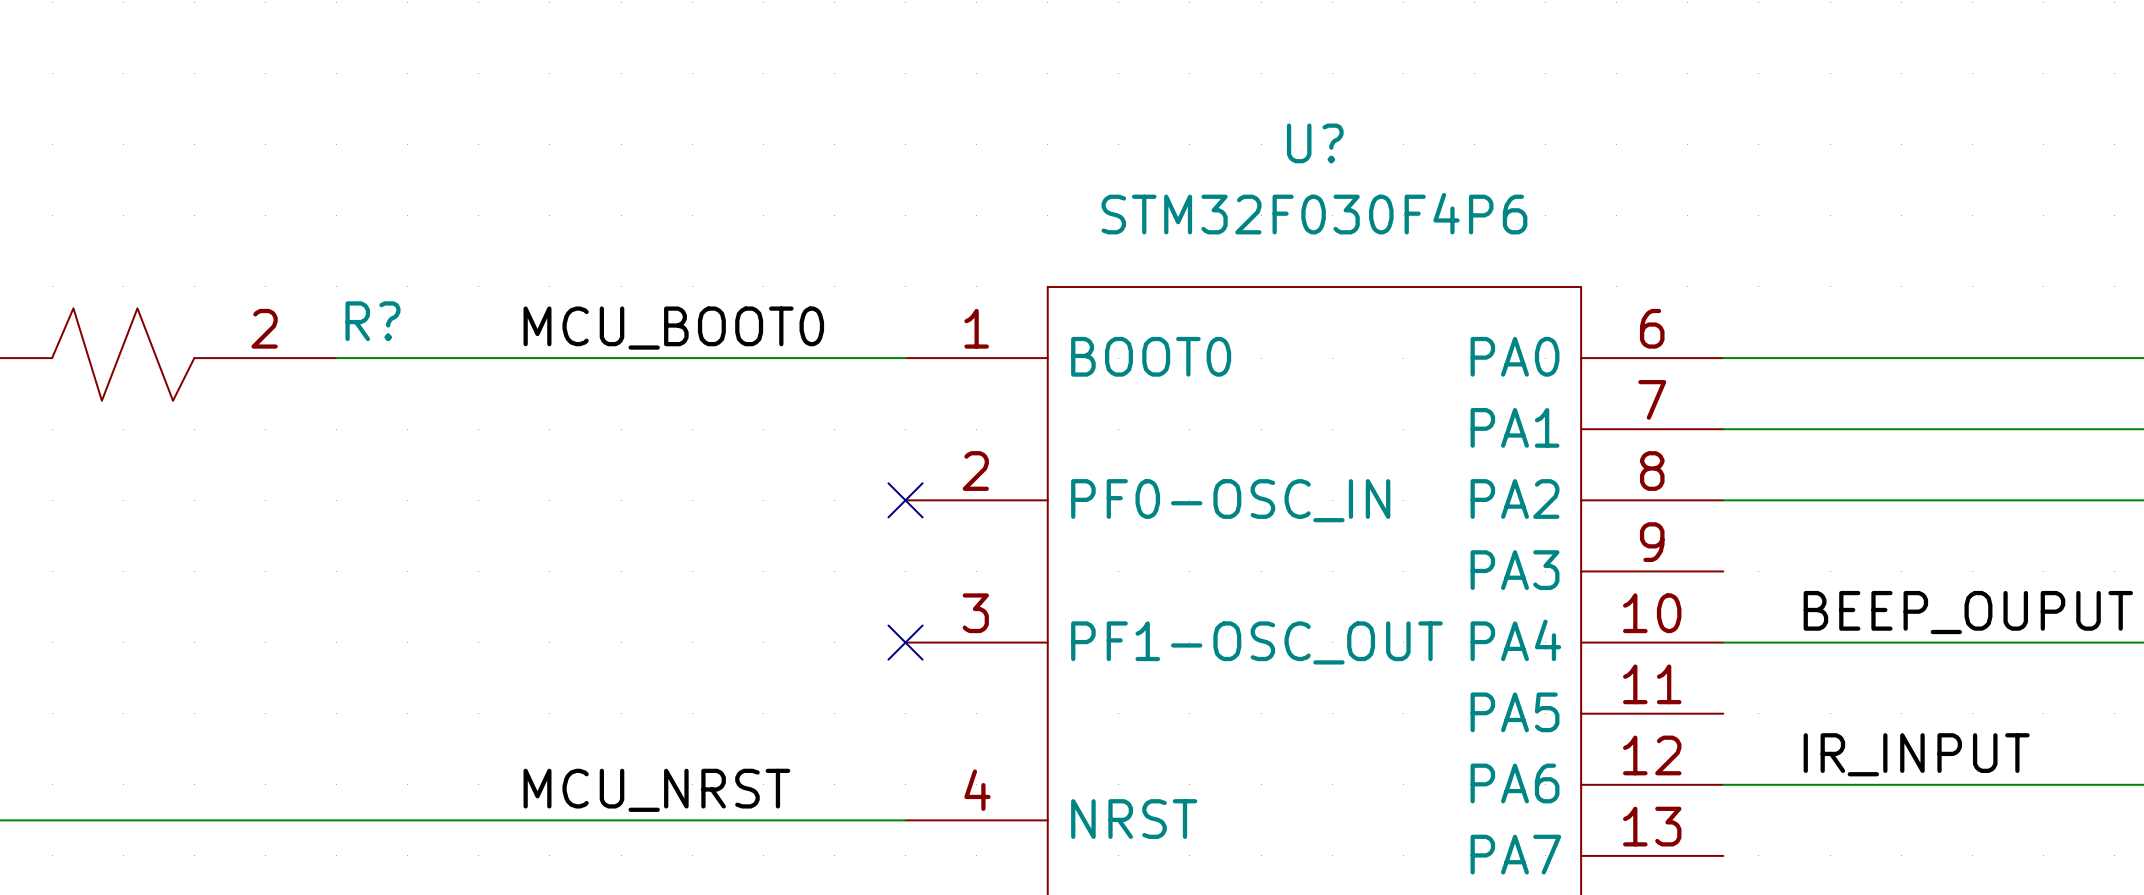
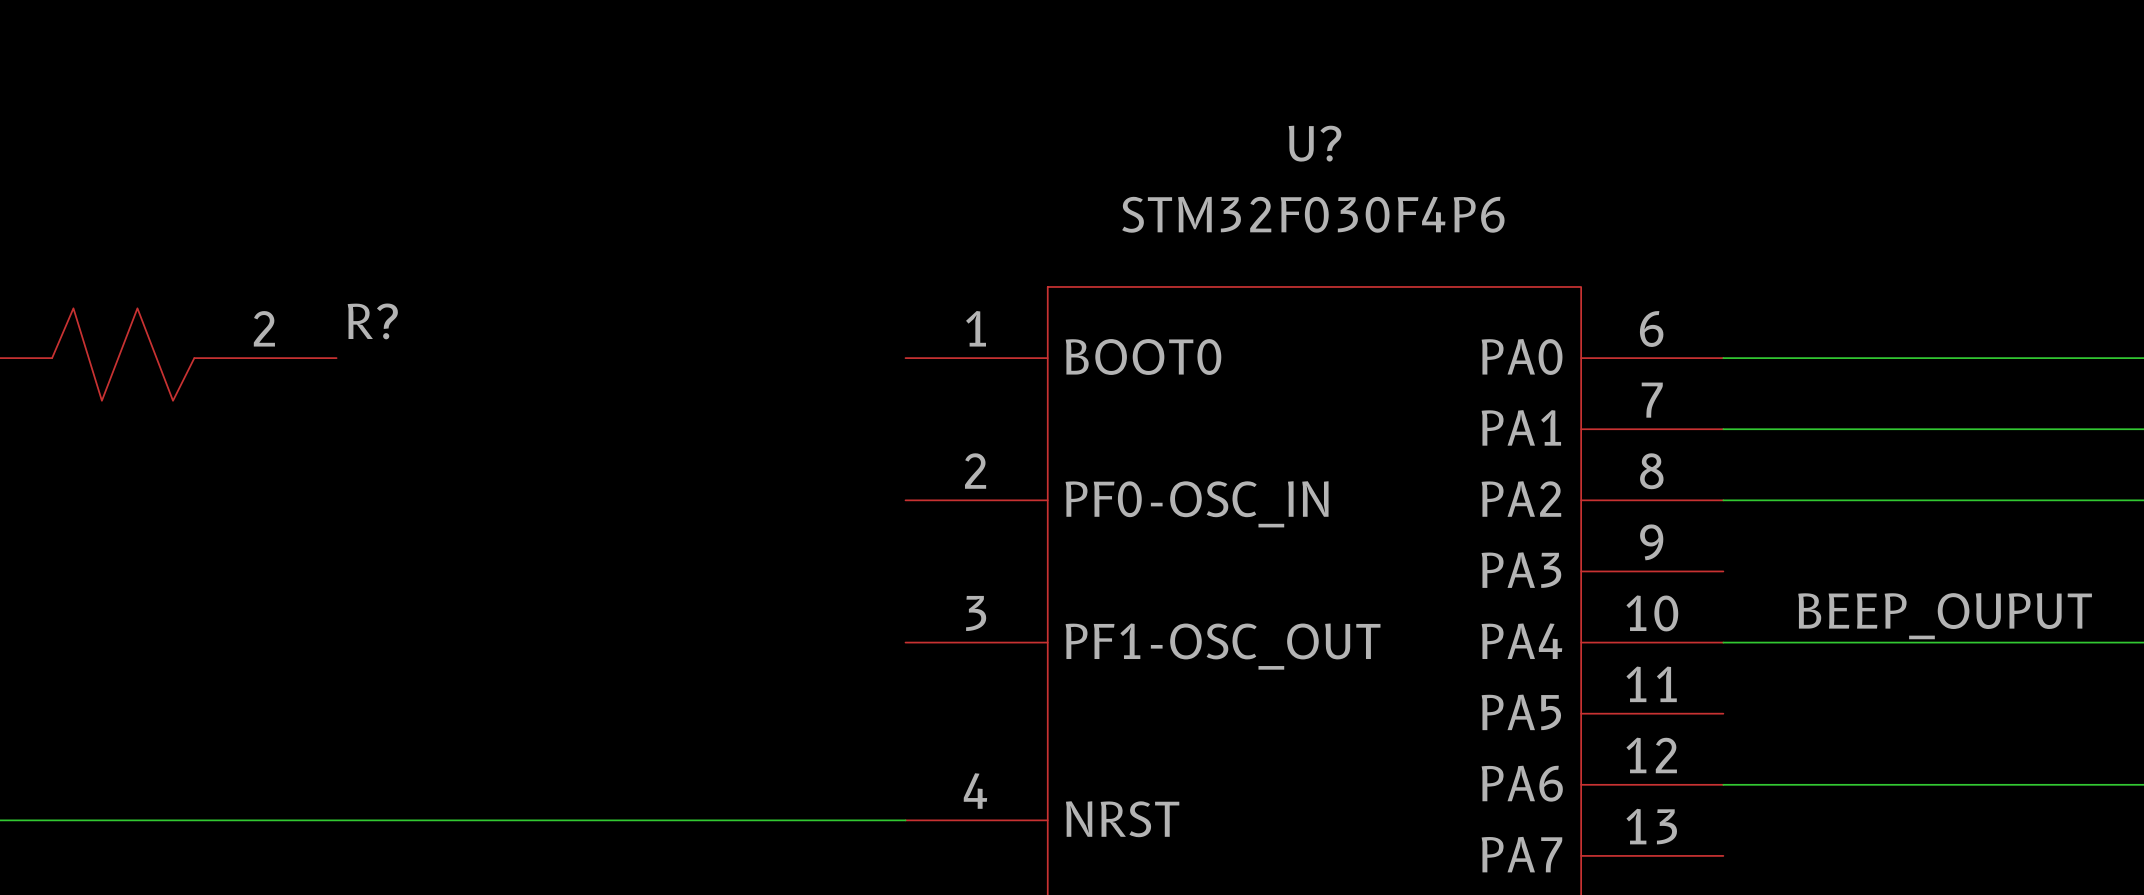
label: MCU_BOOT0 (673, 328) -> none
wire: (336, 358) (905, 358) -> none
no-connect mark: (905, 500) -> none
no-connect mark: (905, 642) -> none
label: IR_INPUT (1916, 754) -> none
label: MCU_NRST (656, 790) -> none

